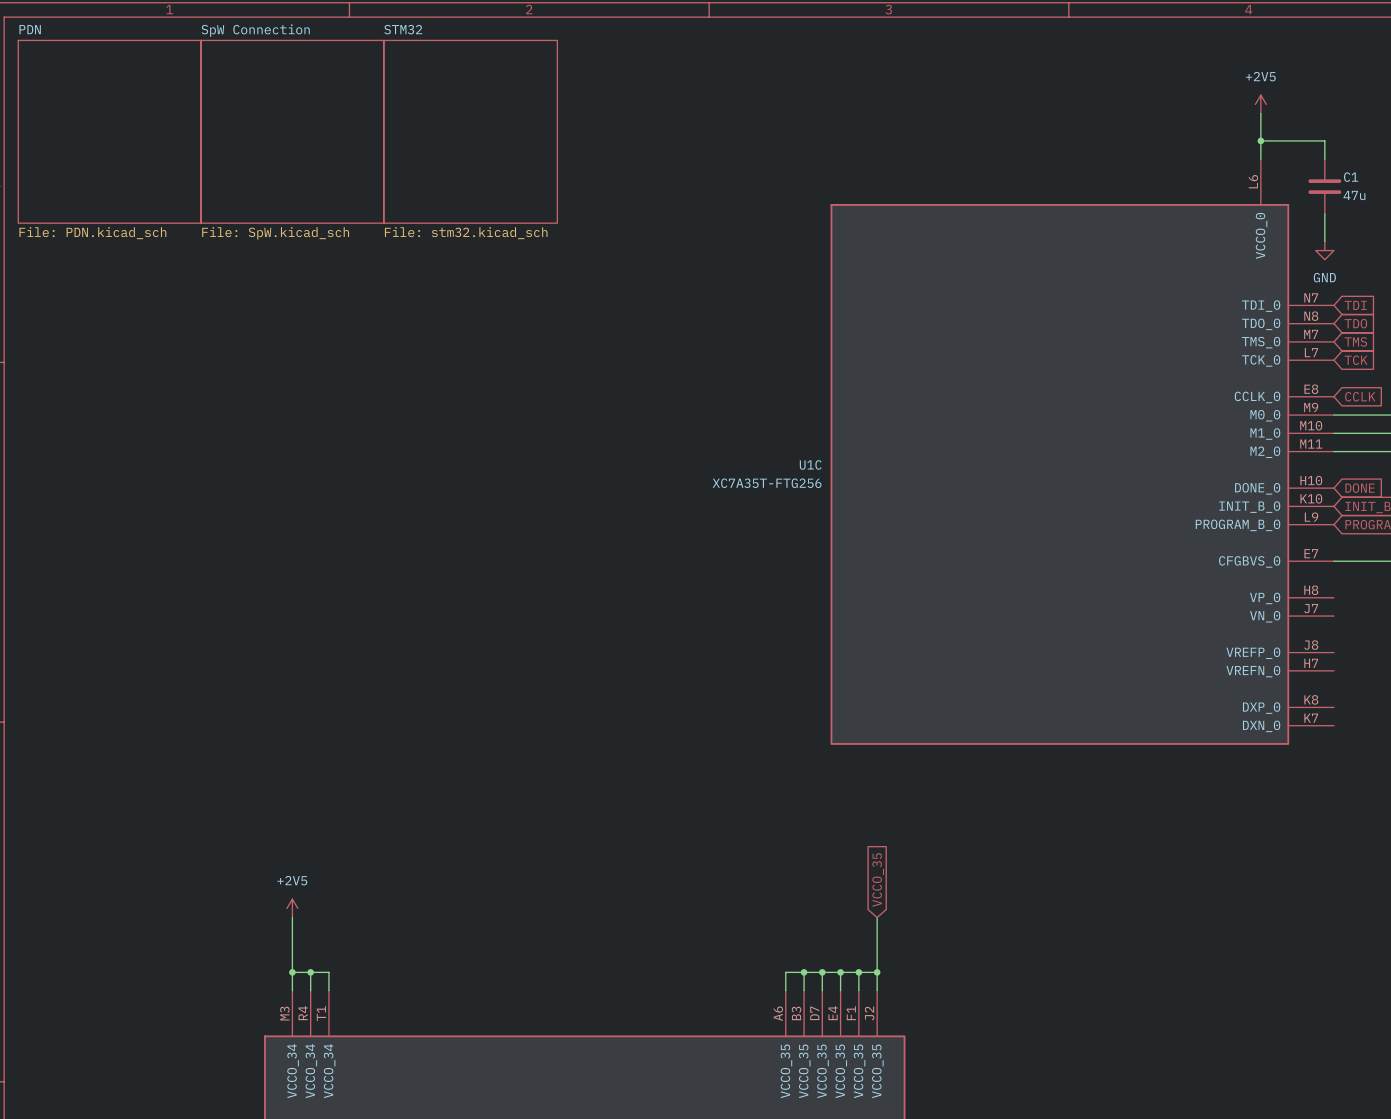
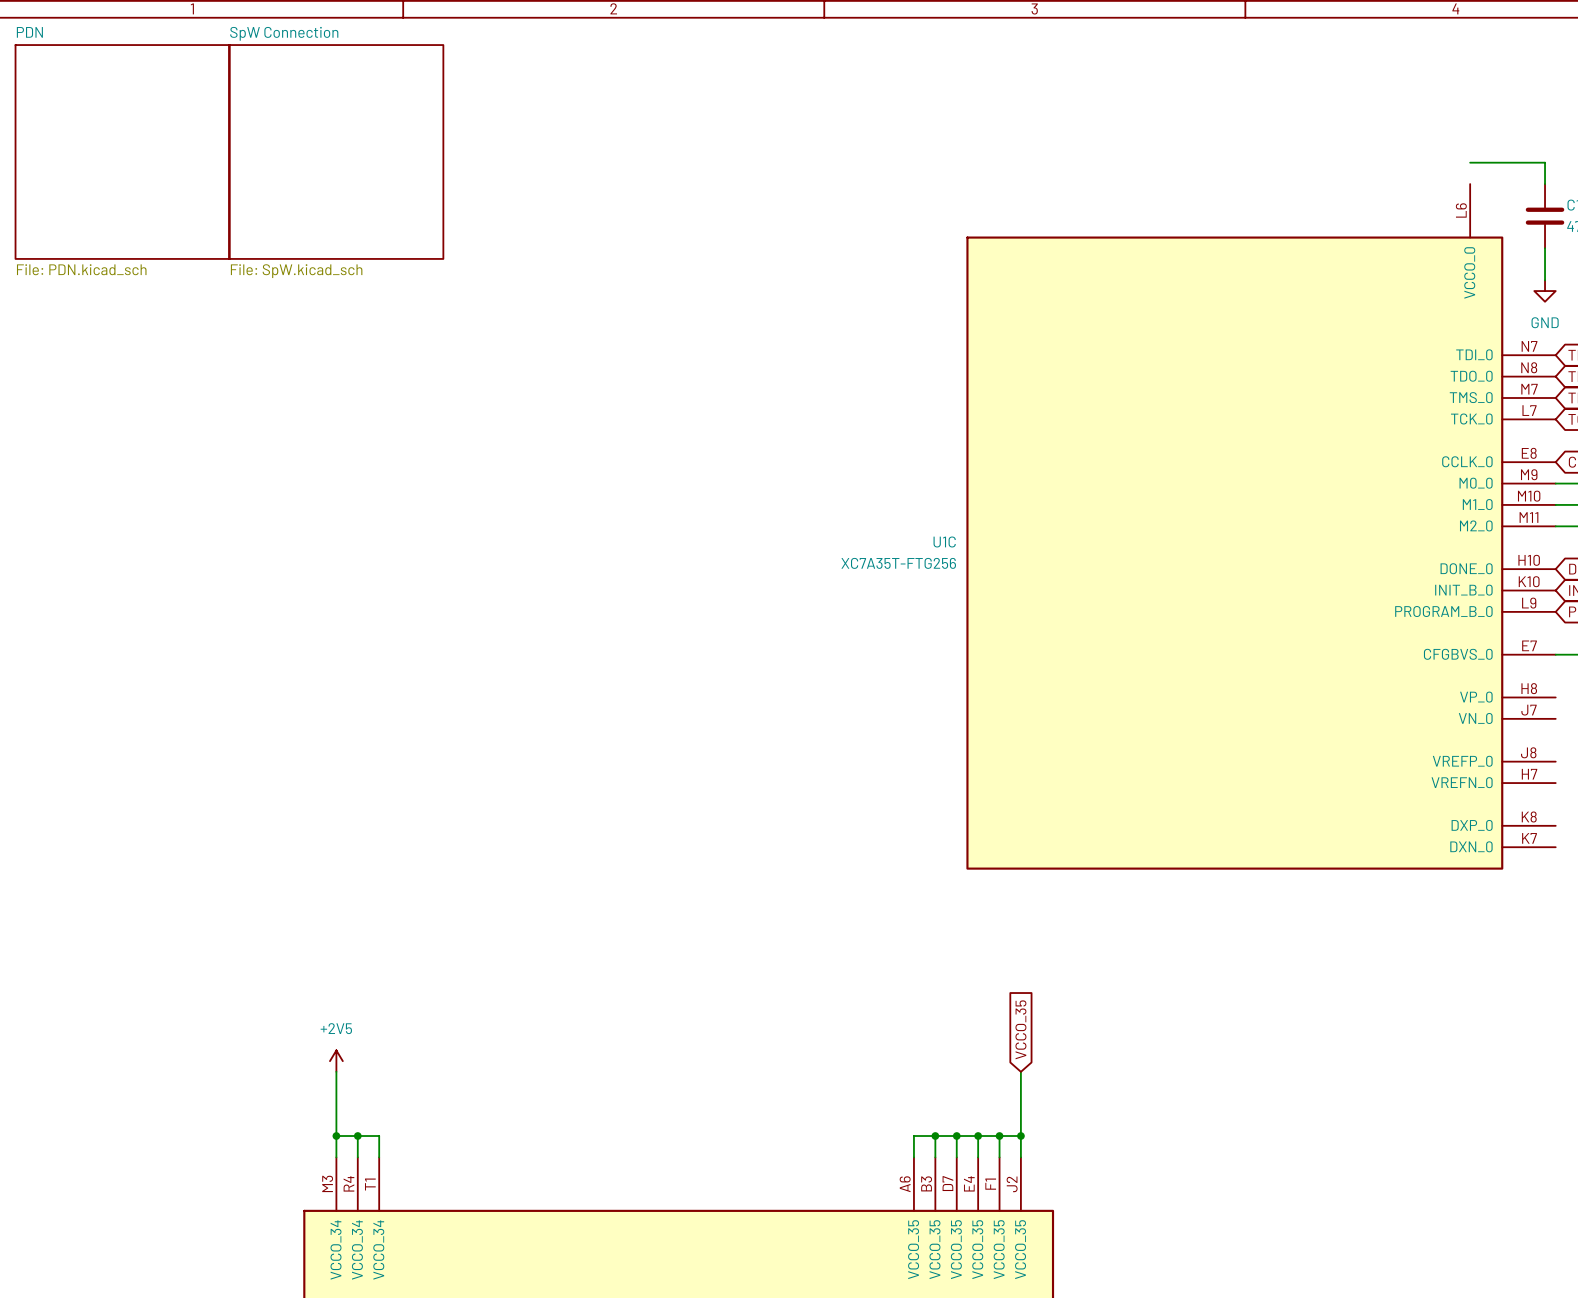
power symbol: +2V5 (1260, 104) -> none
wire: (1260, 113) (1260, 159) -> none
sheet STM32: File: stm32.kicad_sch (470, 131) -> none
junction: (1260, 140) -> none

